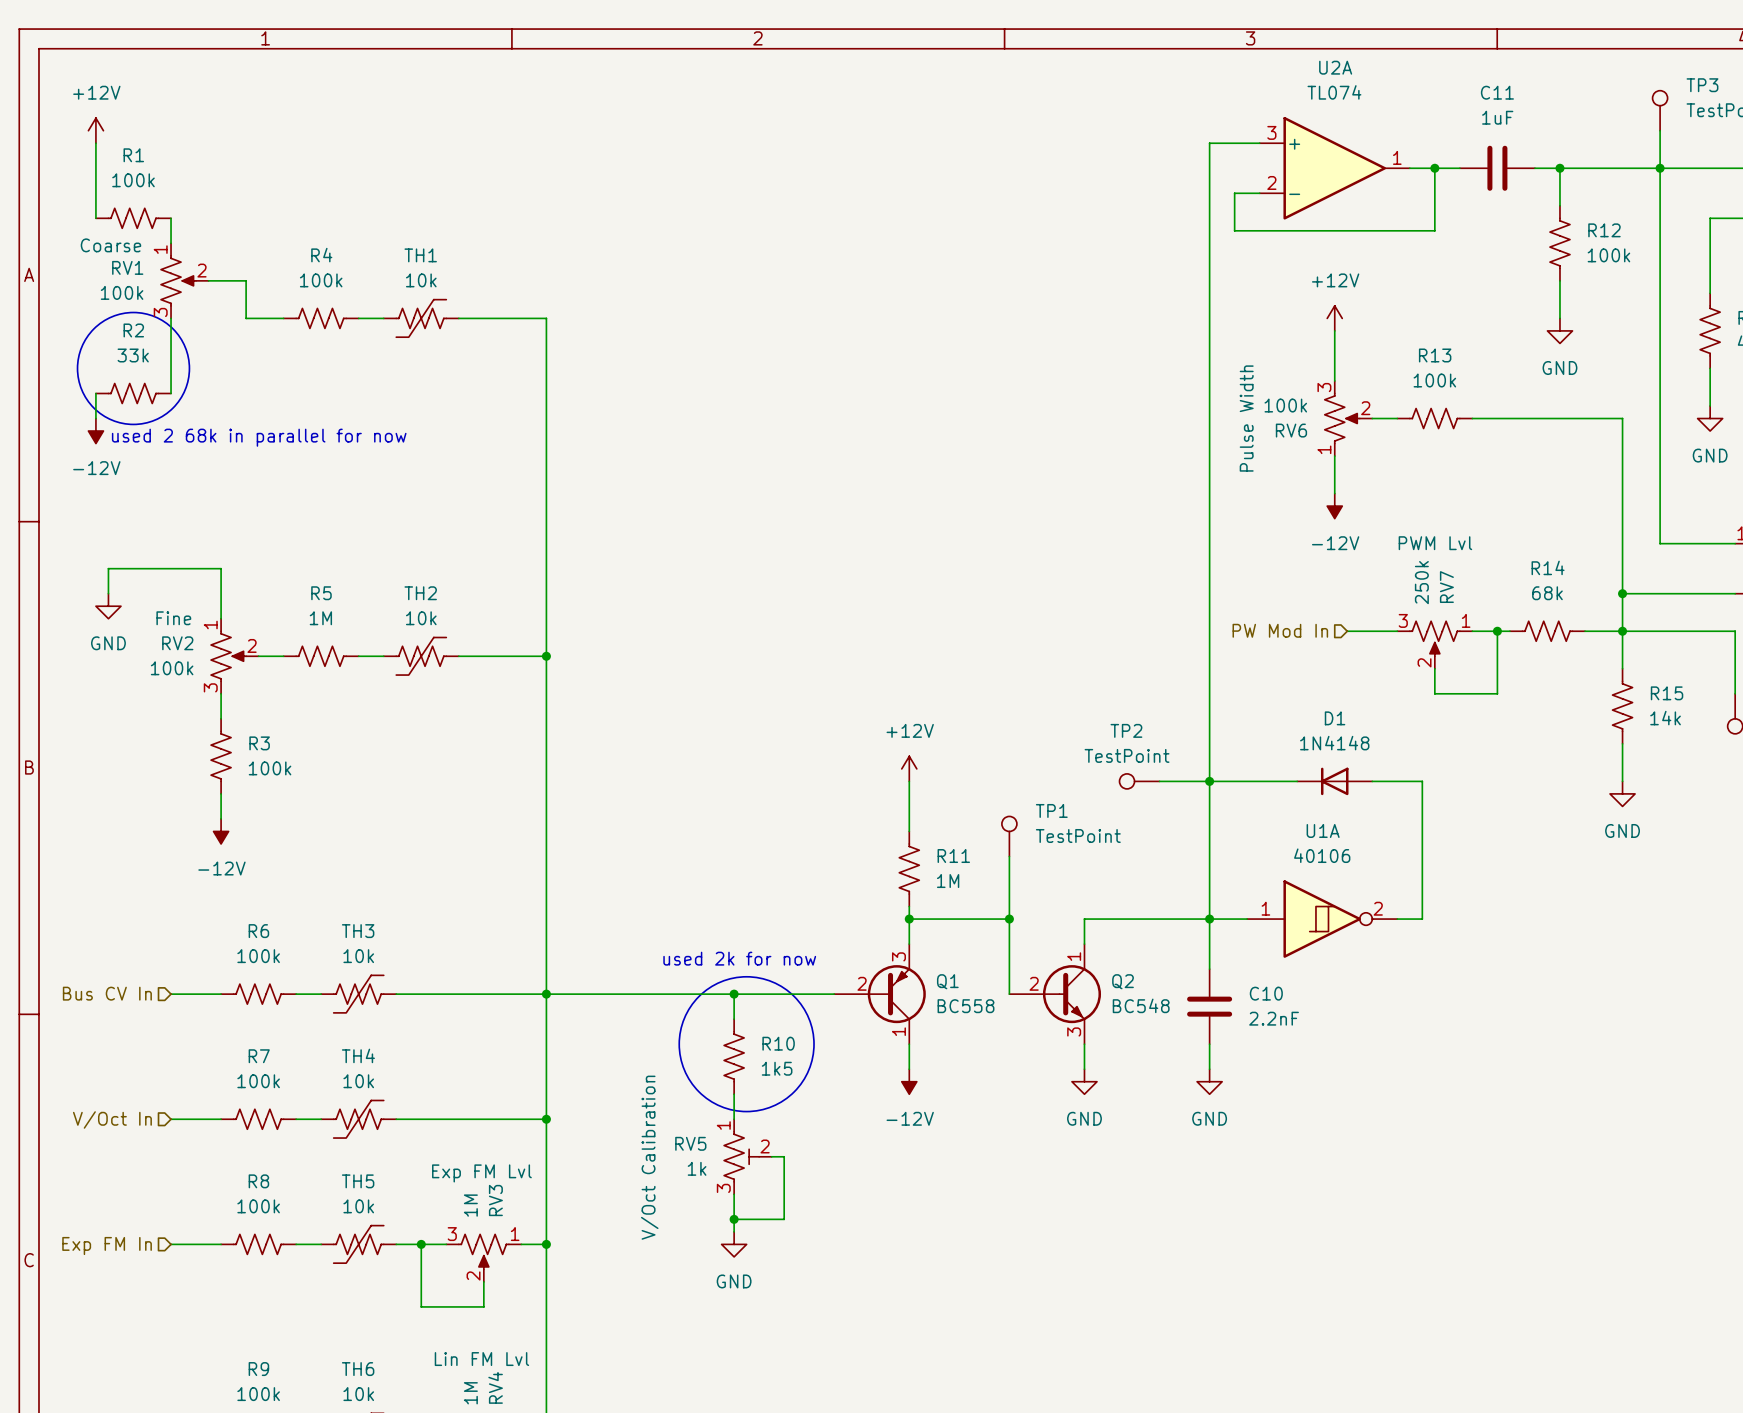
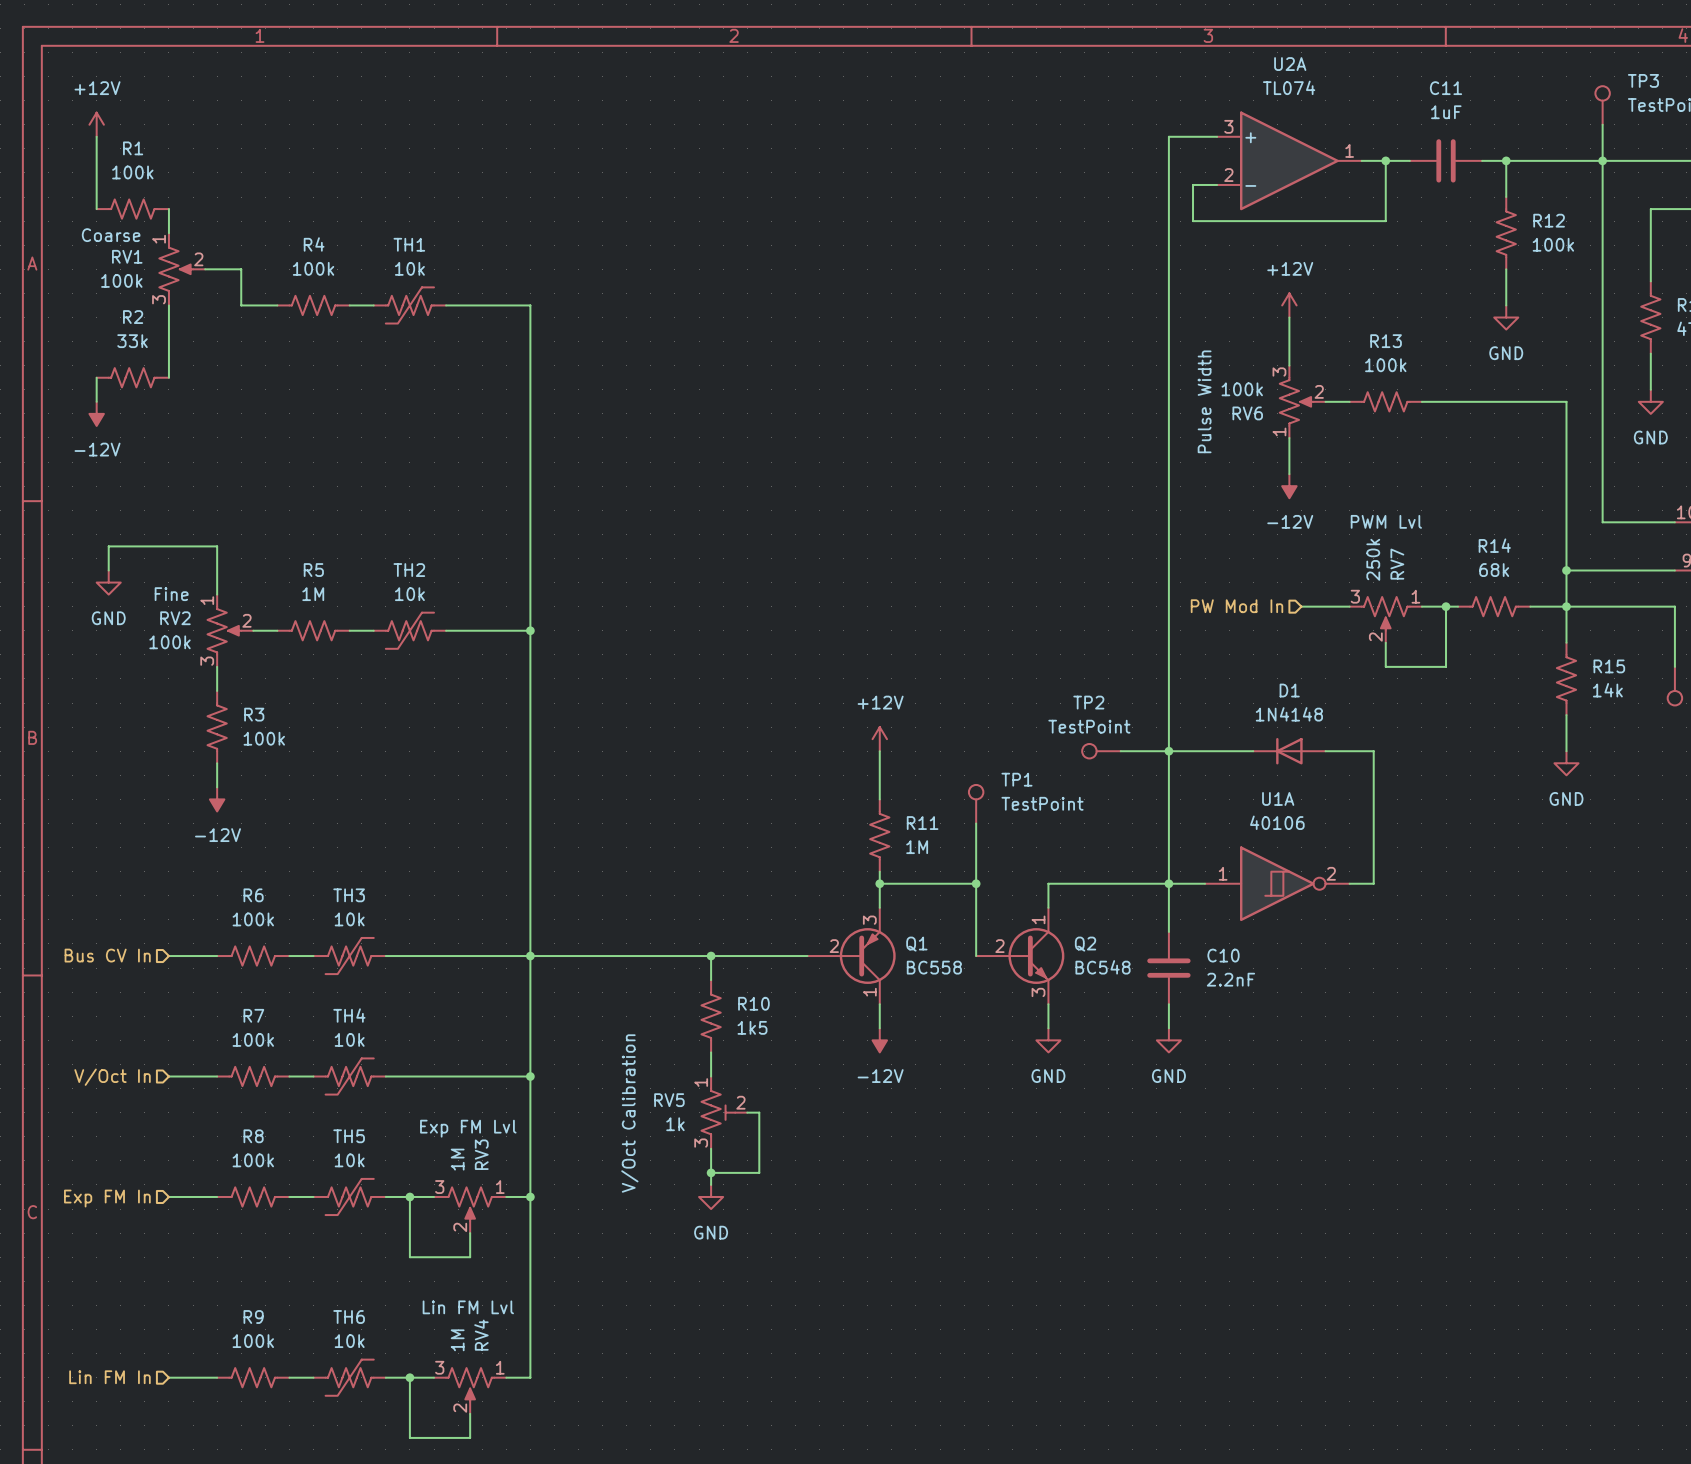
drawing: [77, 312, 190, 425] -> none
text: used 2 68k in parallel for now (259, 437) -> none
text: used 2k for now (739, 958) -> none
drawing: [679, 976, 815, 1112] -> none

